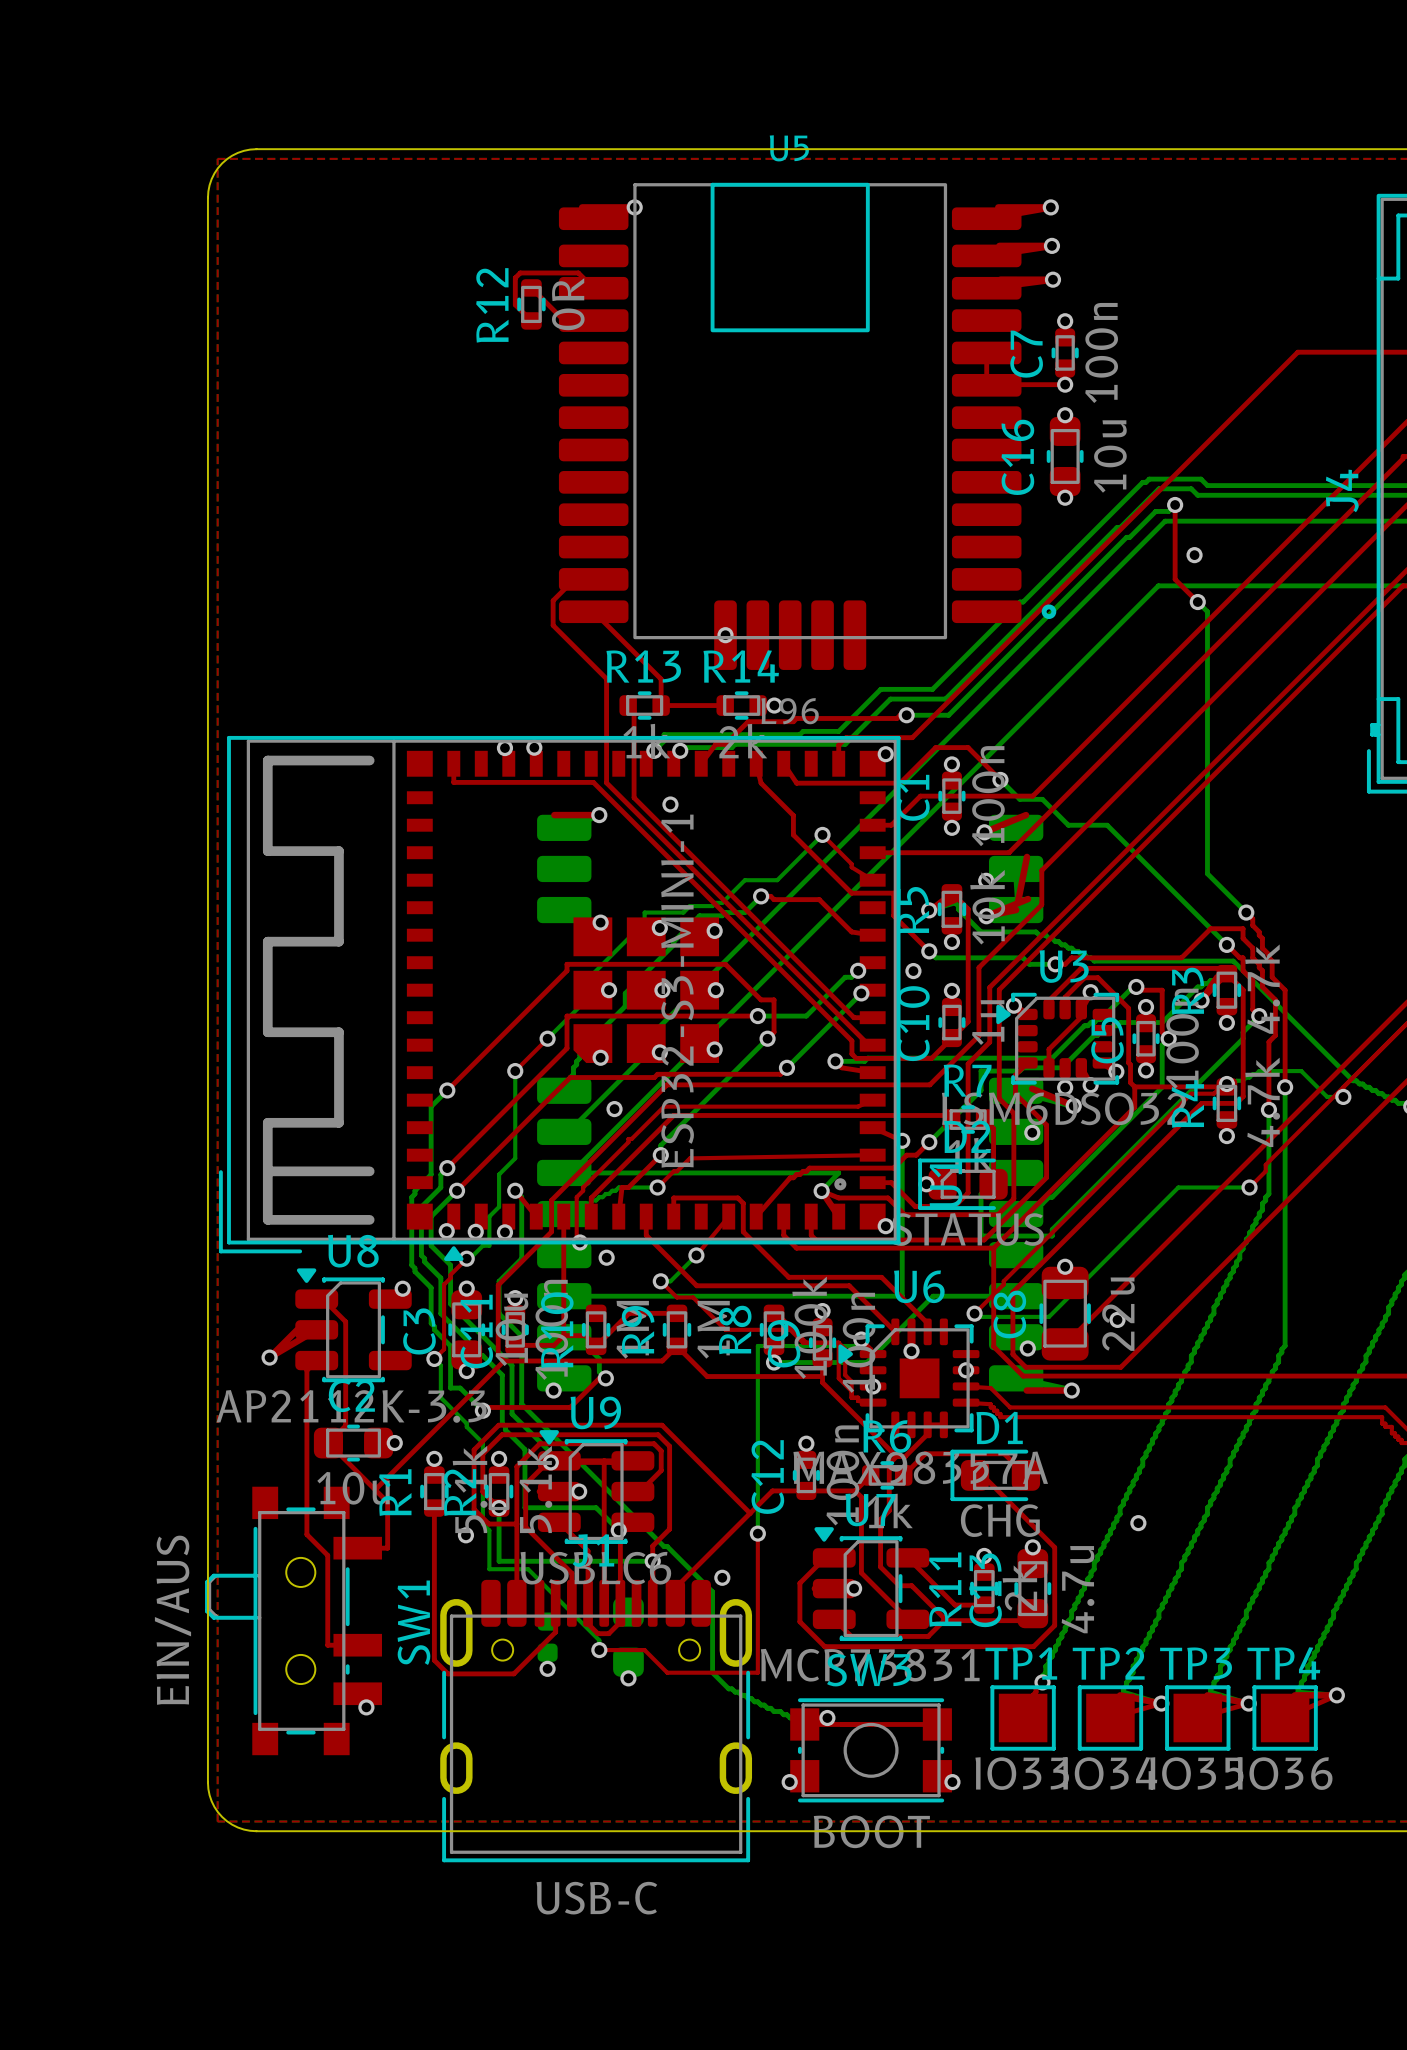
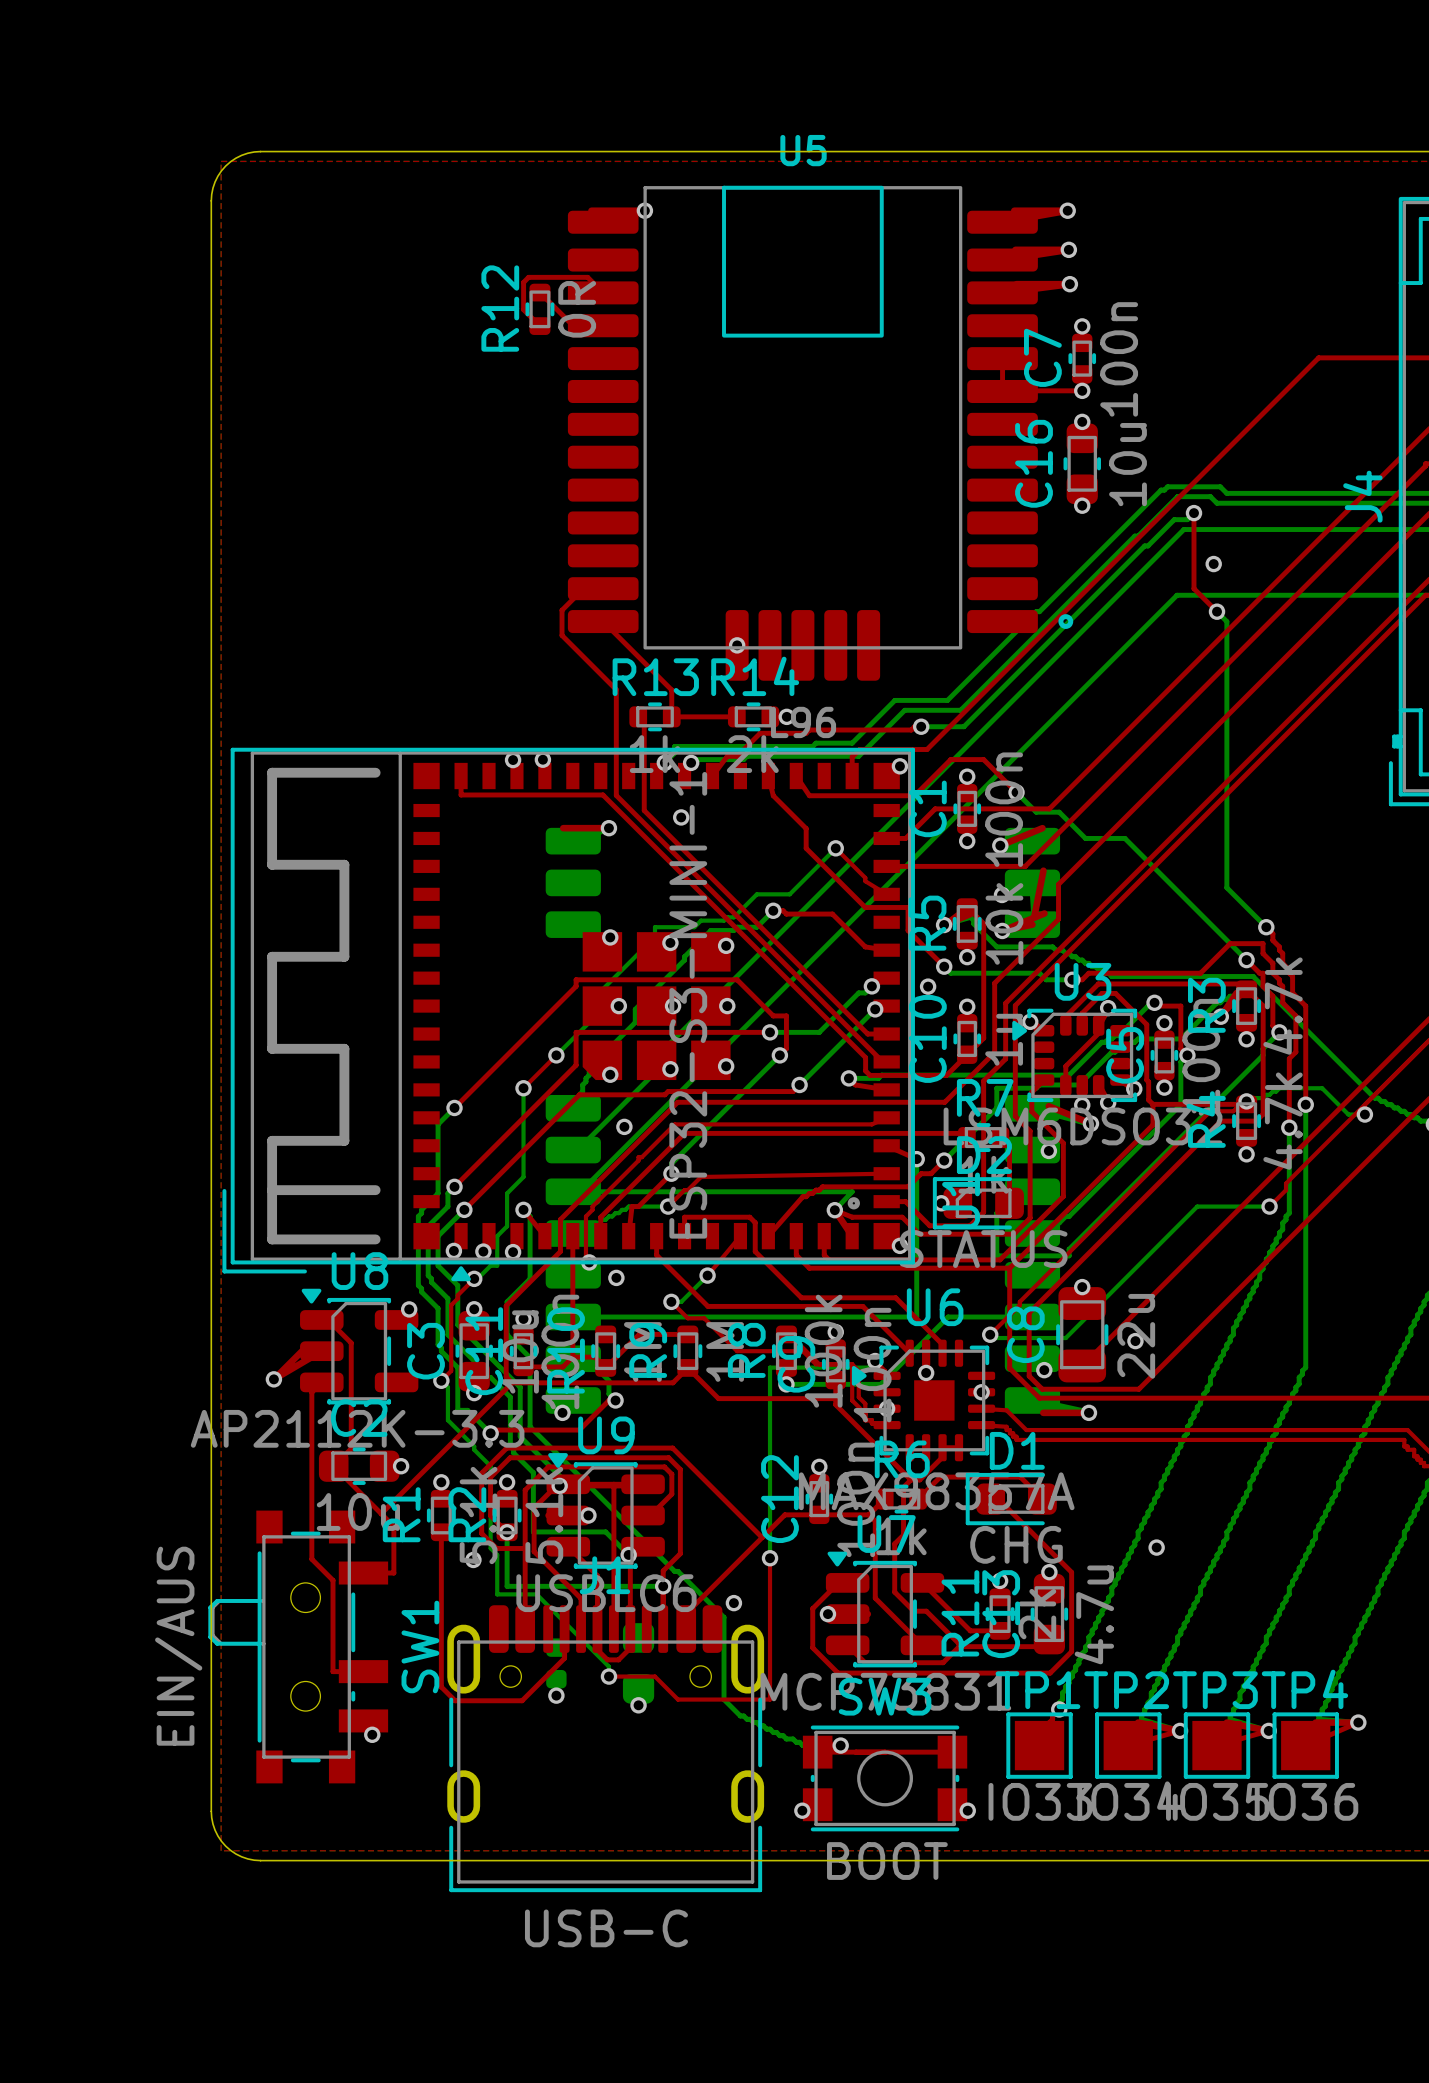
via position: (854, 1588) -> (827, 1614)

